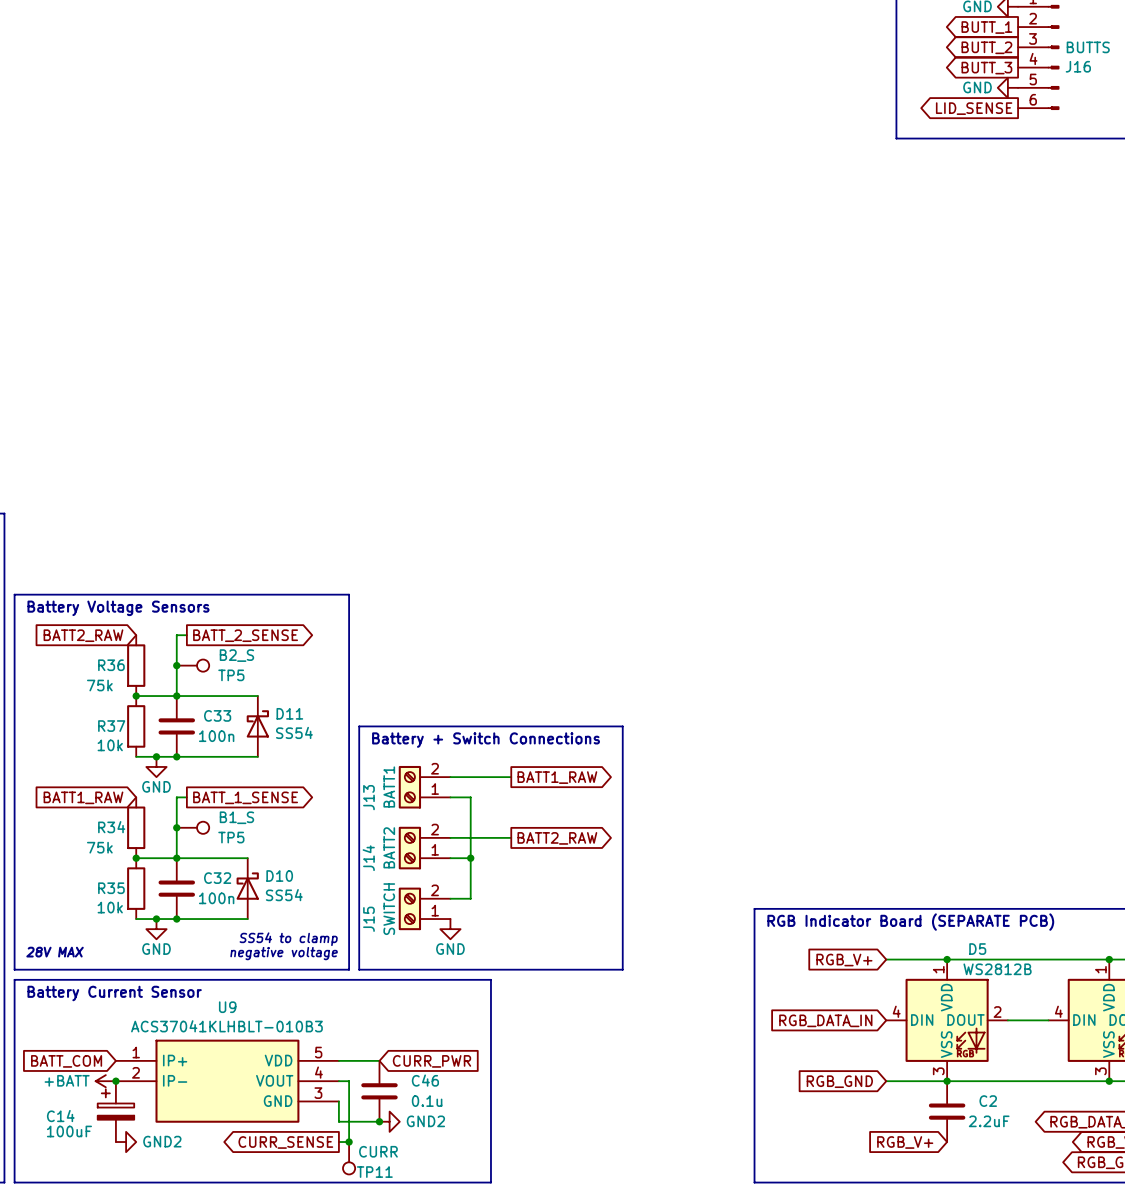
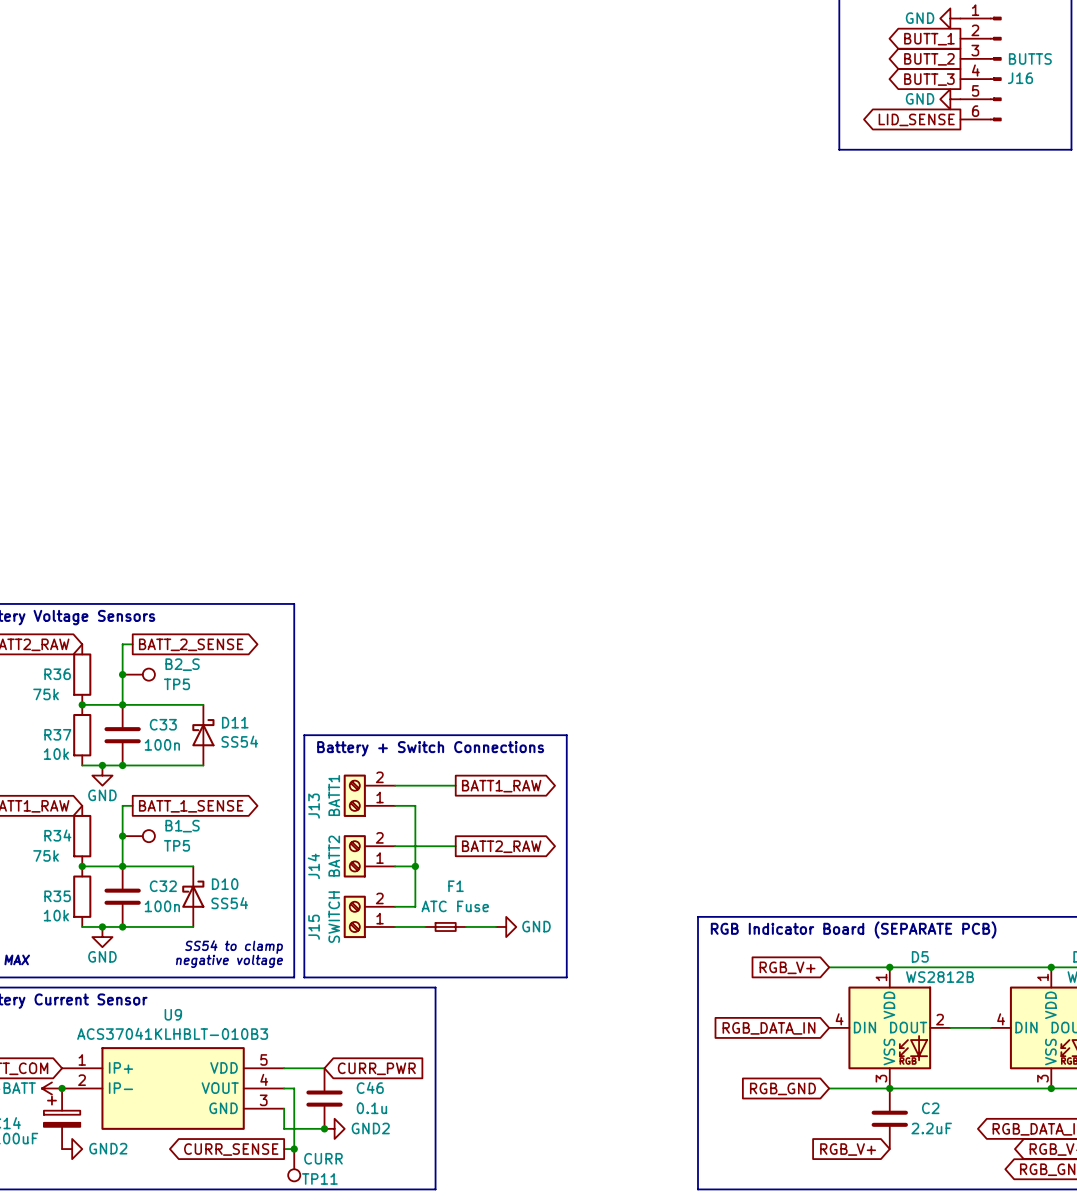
wire: none -> (395, 926) (425, 926)
F1: none -> ATC Fuse (445, 926)
wire: none -> (465, 926) (496, 926)
power symbol rotation: 0° (450, 929) -> 90° counterclockwise (506, 926)
power symbol position: GND (450, 929) -> GND (506, 926)

